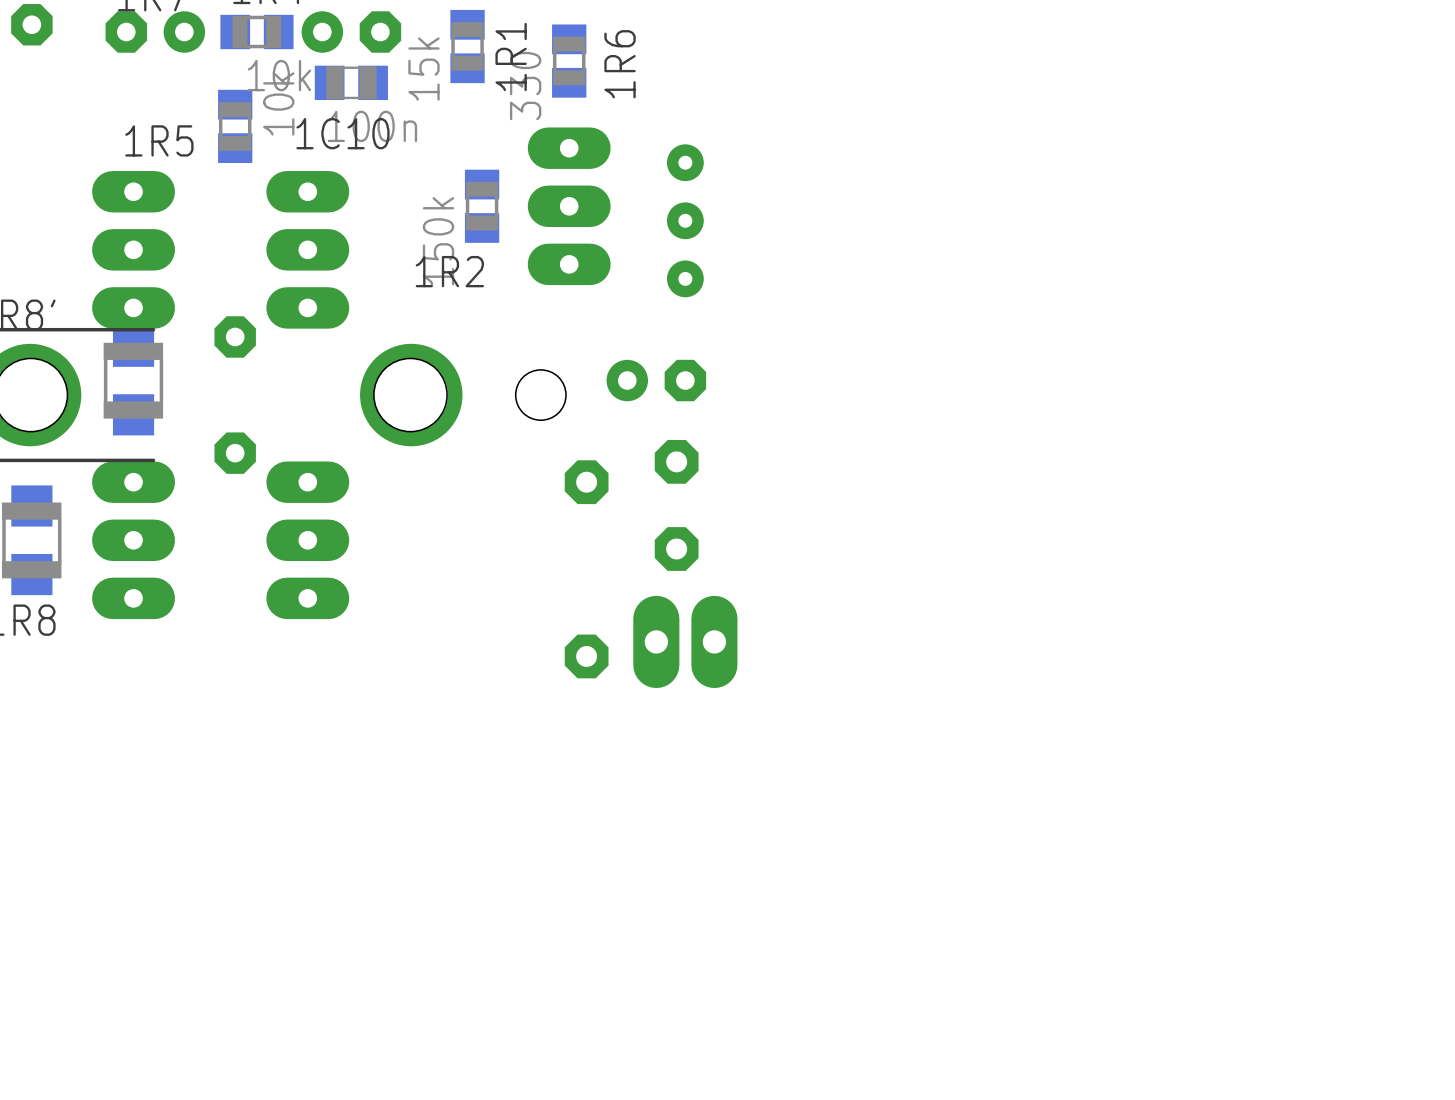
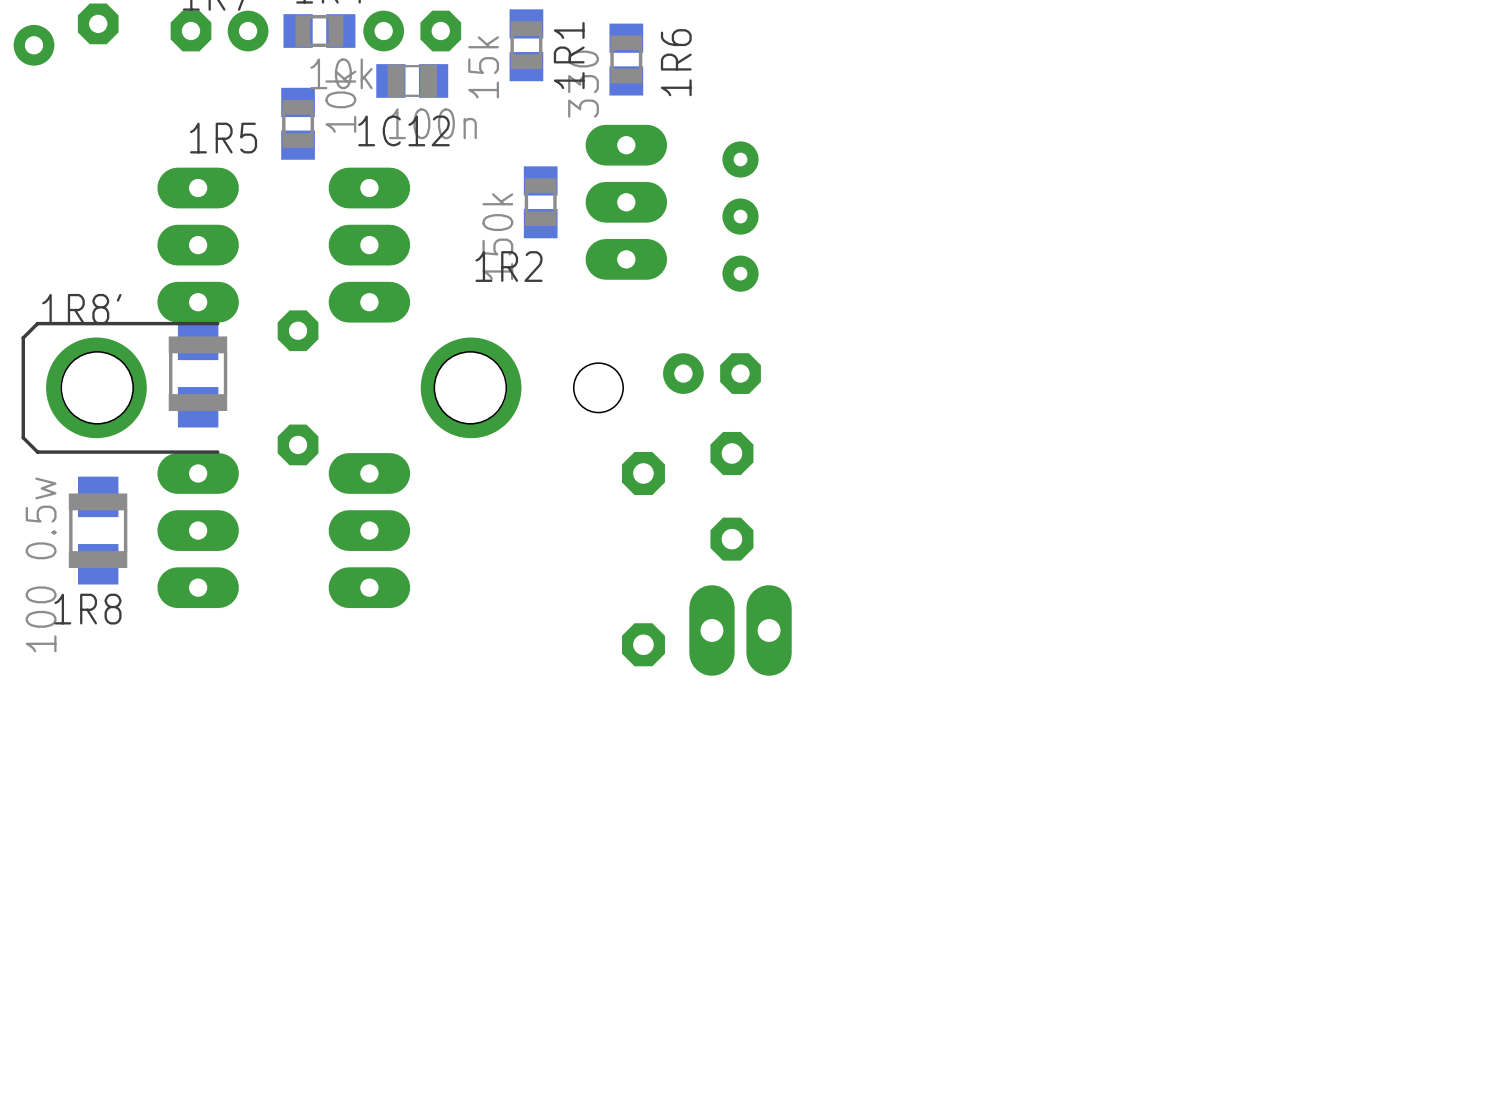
1C10 name: 1C10 (342, 133) -> 1C12 (404, 130)

